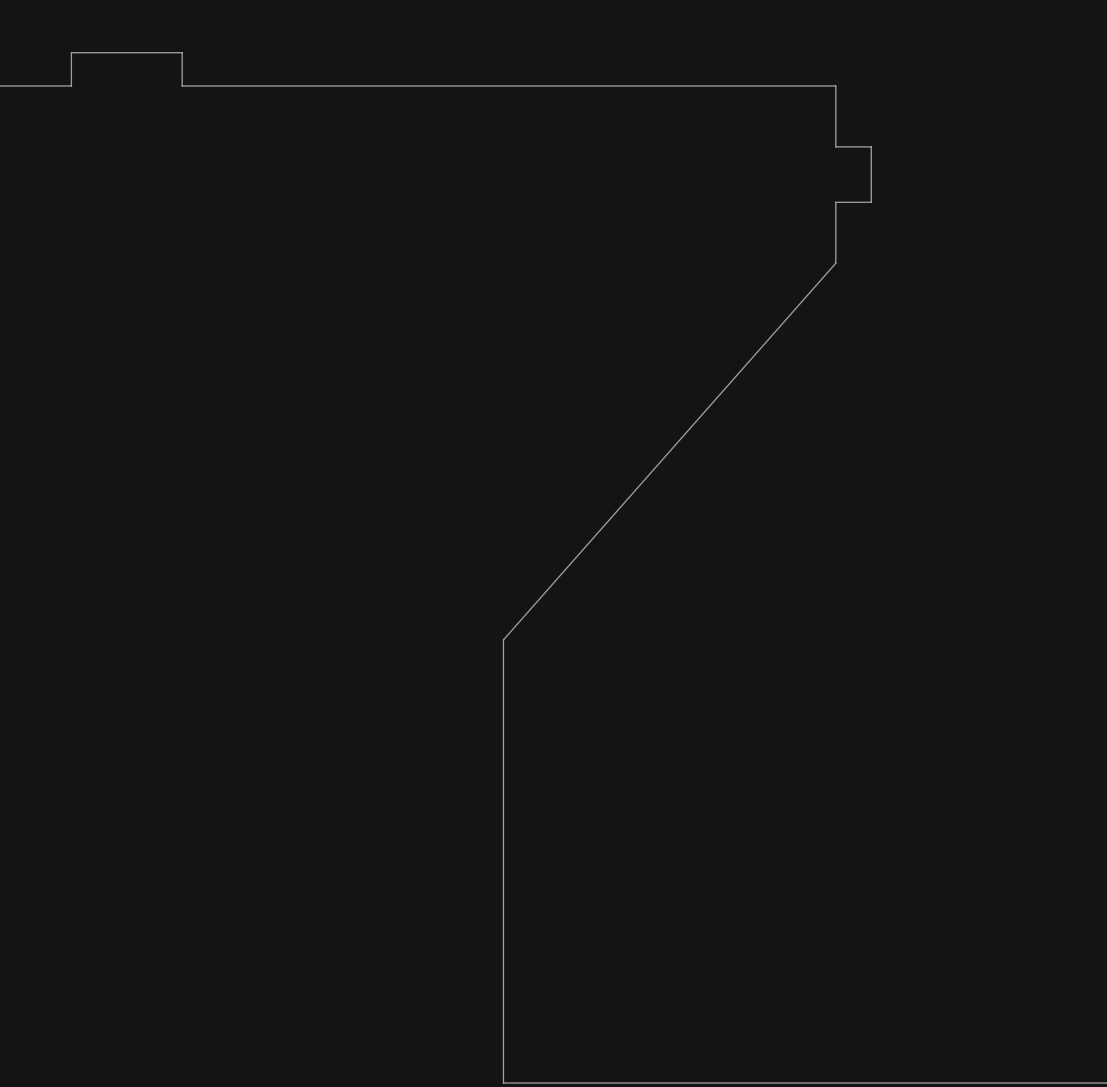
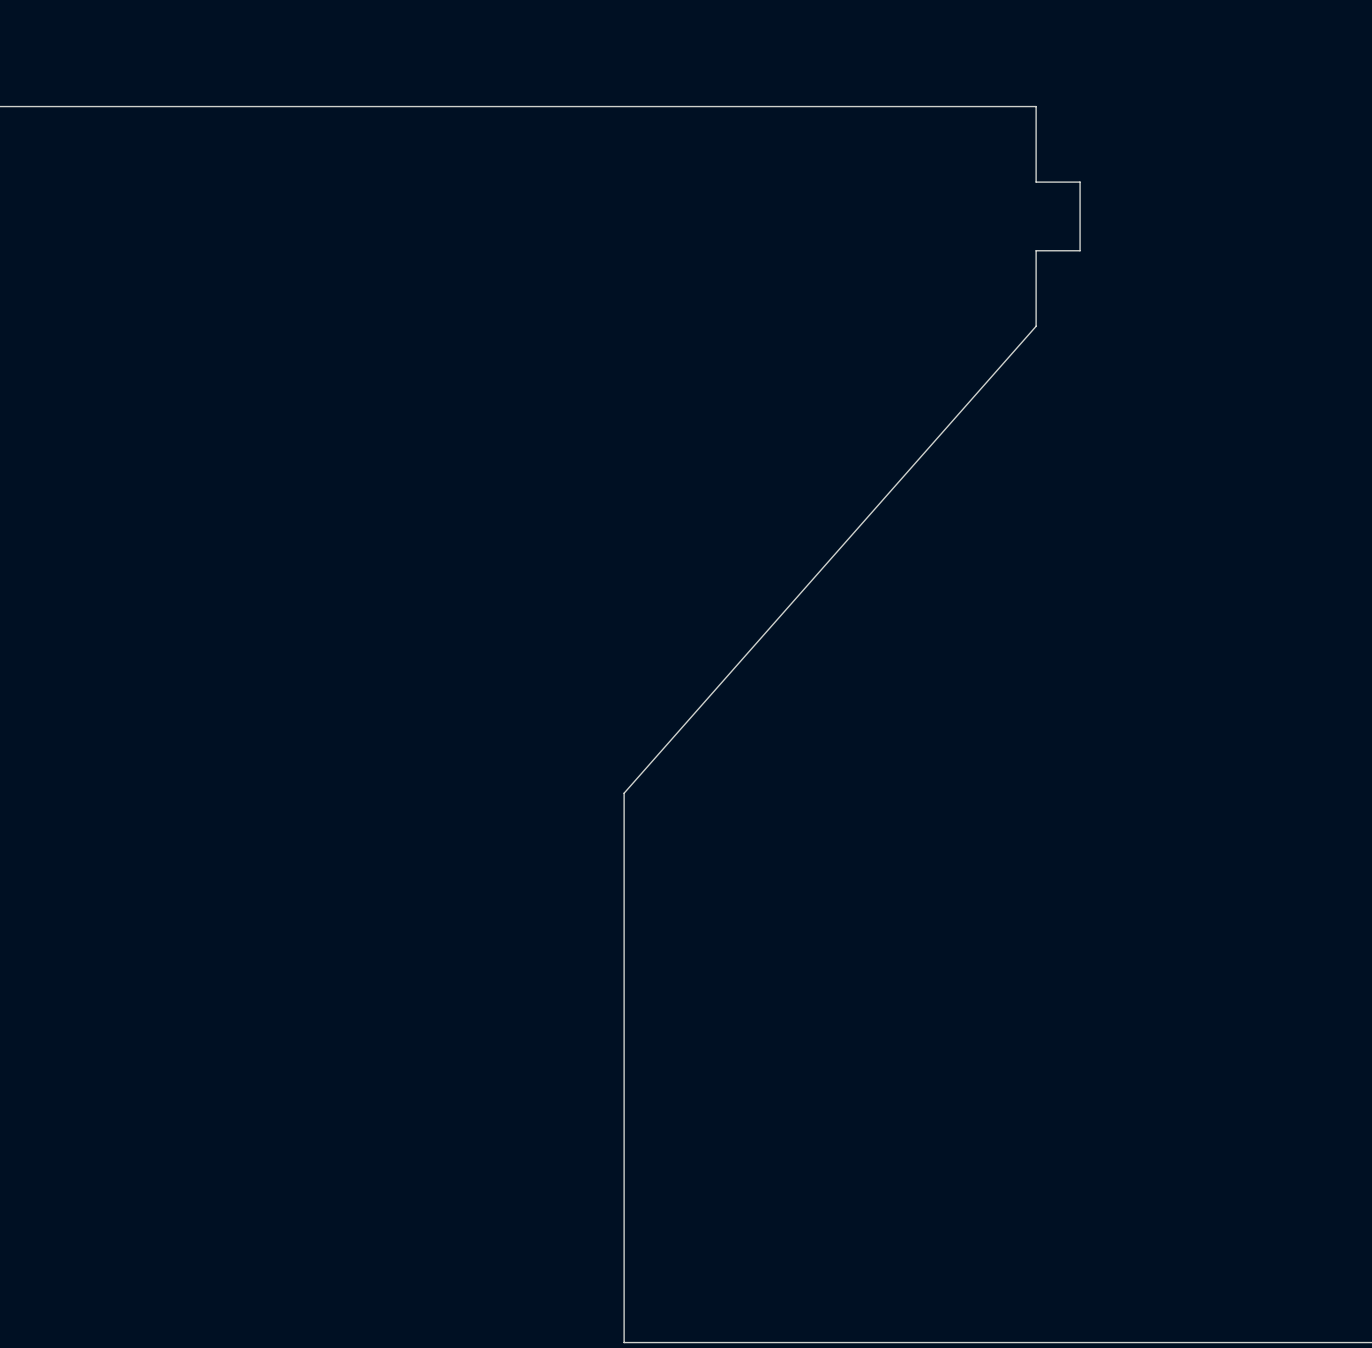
board edge: (71, 85) (71, 52) (182, 52) (182, 85) -> (88, 106) (225, 106)

